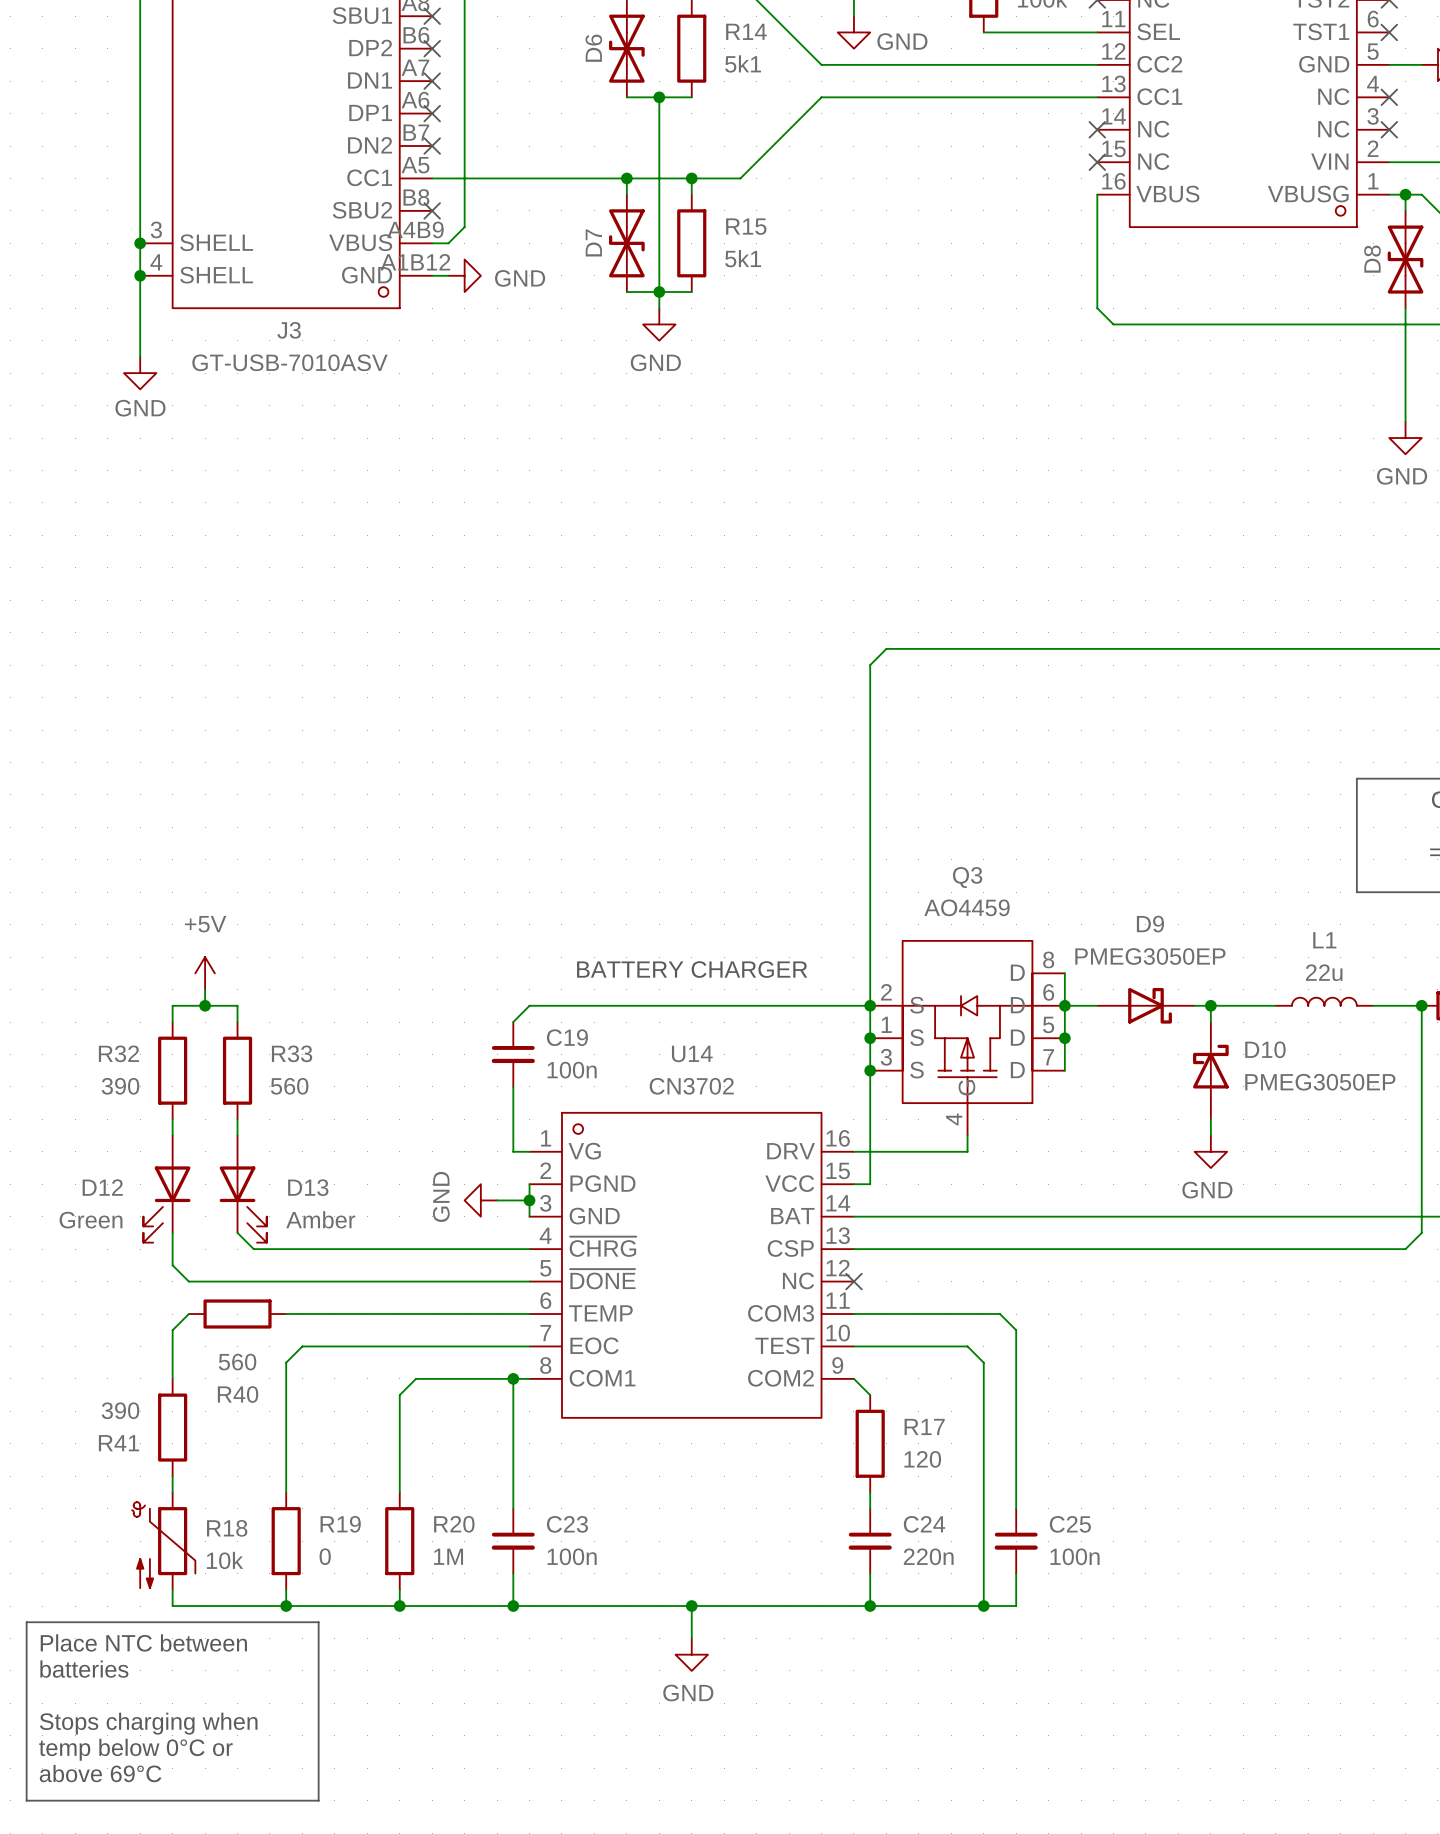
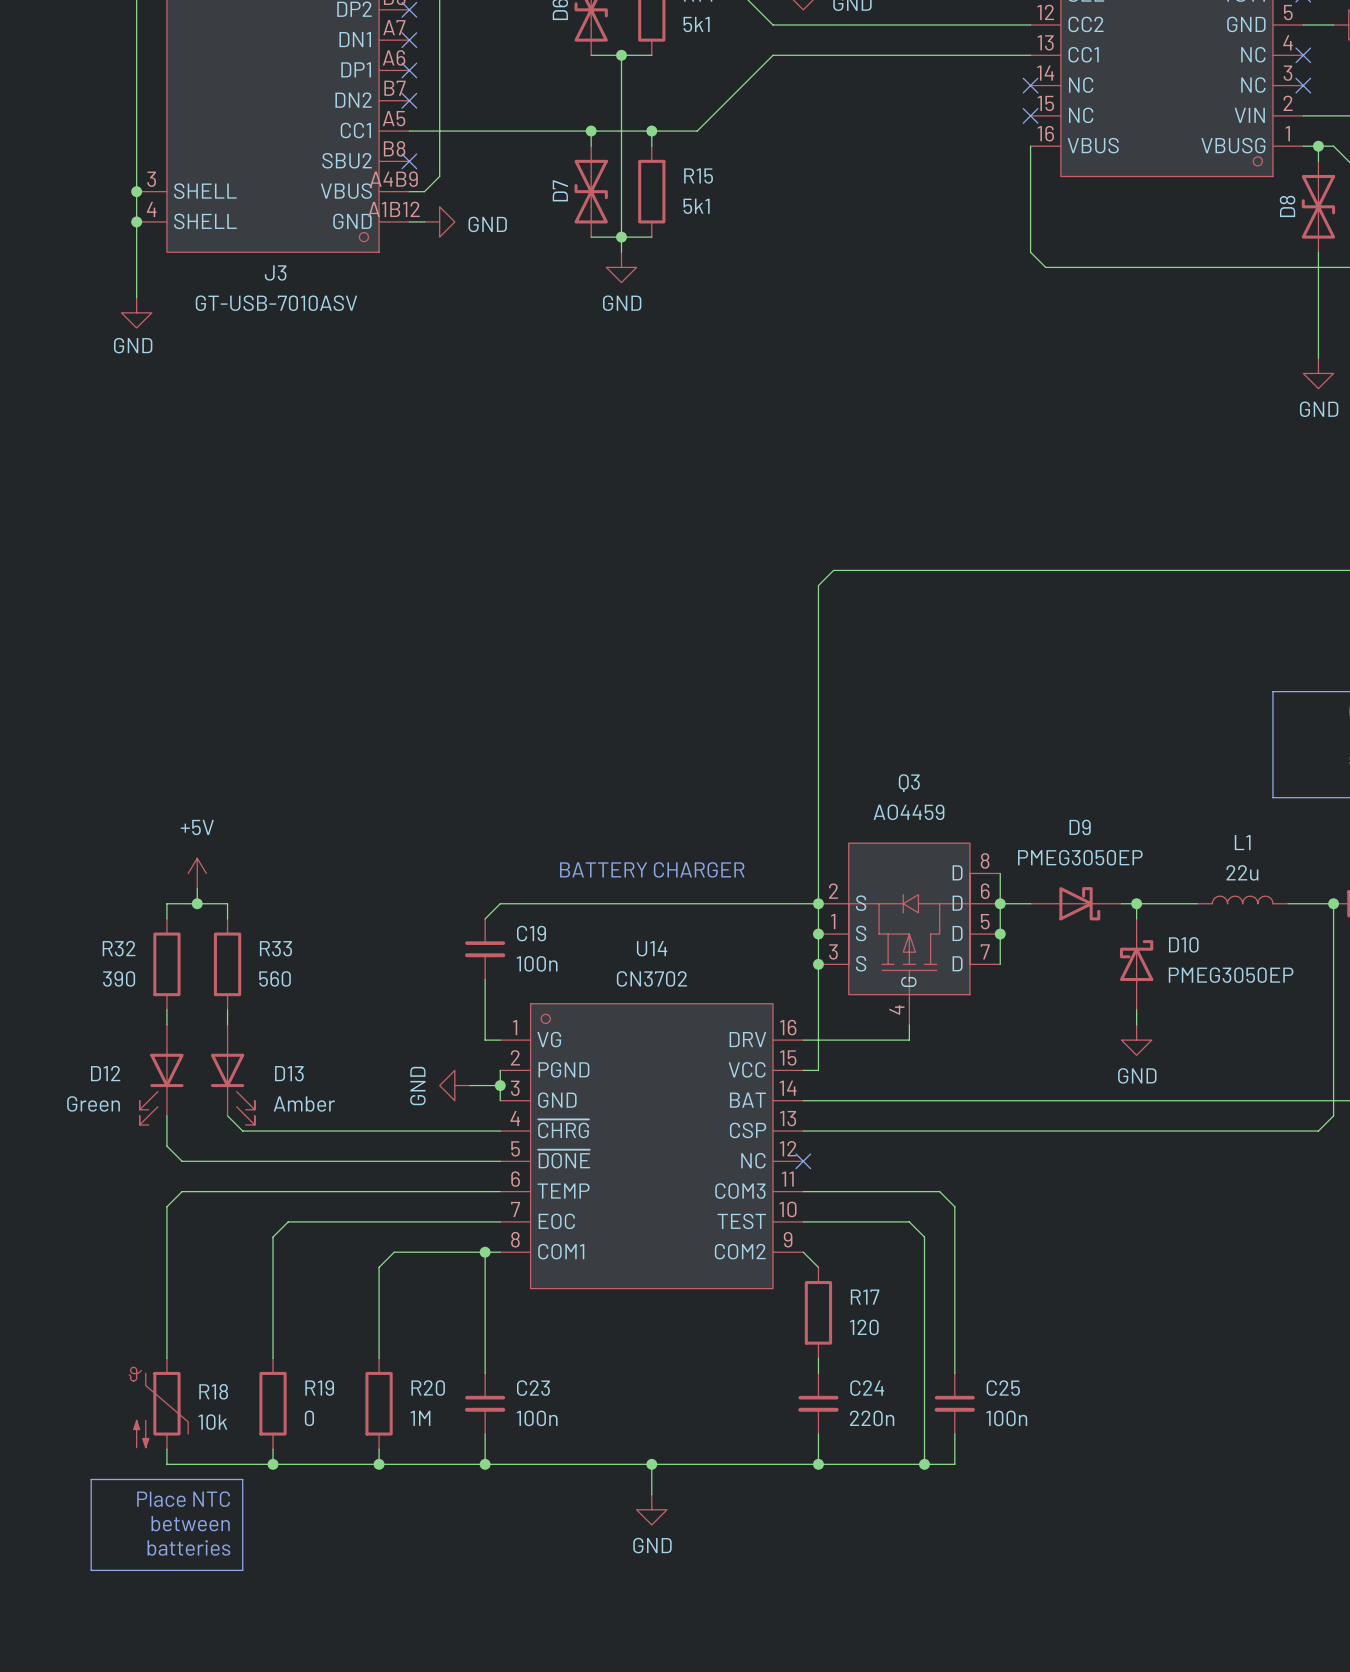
wire: none -> (182, 1191) (273, 1191)
R40: 560 (237, 1314) -> none
wire: none -> (166, 1252) (166, 1343)
R41: 390 (172, 1427) -> none
line: (91, 1622) (26, 1622) (26, 1800) (318, 1800) (318, 1622) (253, 1622) -> (91, 1479) (91, 1570) (242, 1570) (242, 1479)
text: Place NTC between (143, 1642) -> Place NTC (183, 1499)
text position: batteries (84, 1669) -> batteries (188, 1547)
text: none -> between (190, 1523)
text: Stops charging when (148, 1723) -> none
text: temp below 0°C or (135, 1749) -> none
text: above 69°C (100, 1773) -> none

